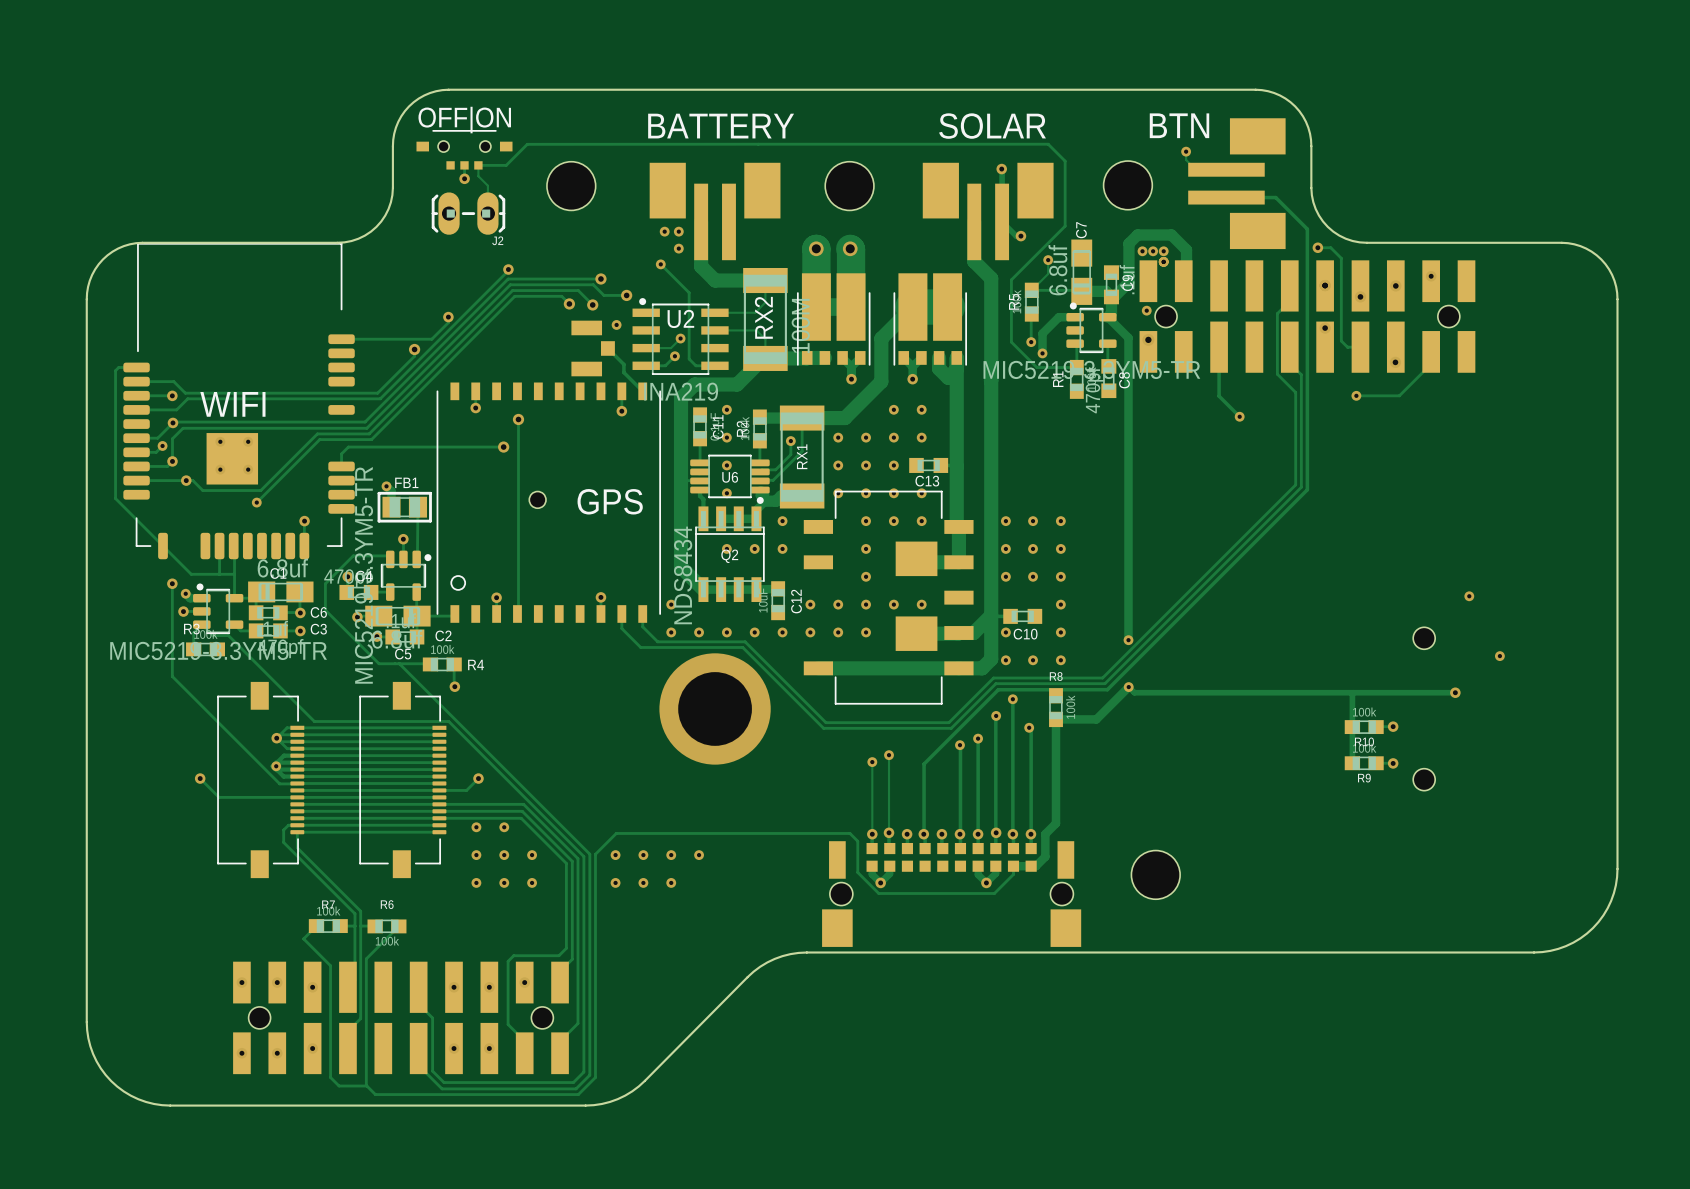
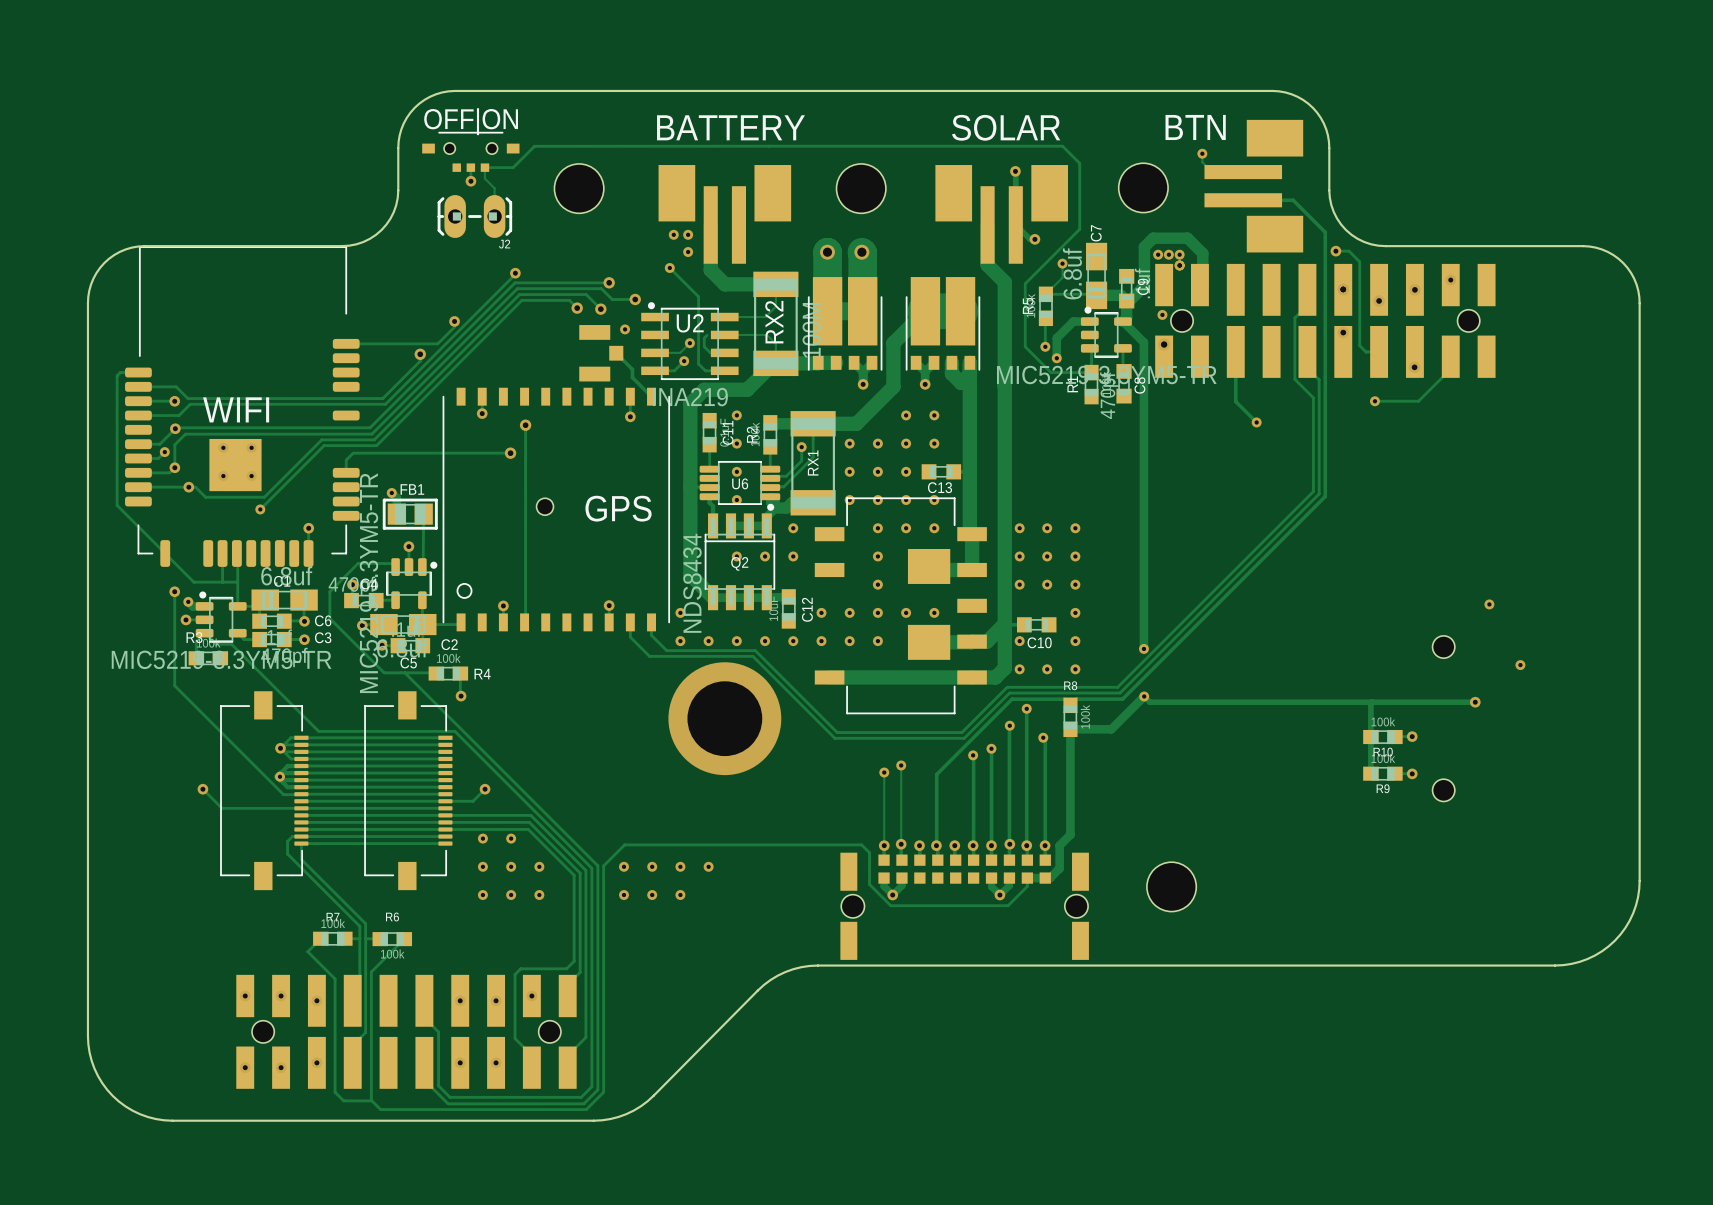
track: none -> (707, 335) (704, 338) (704, 346) (710, 352) (724, 352)
part footprint: [822, 841, 1082, 947] -> [840, 852, 1089, 960]

